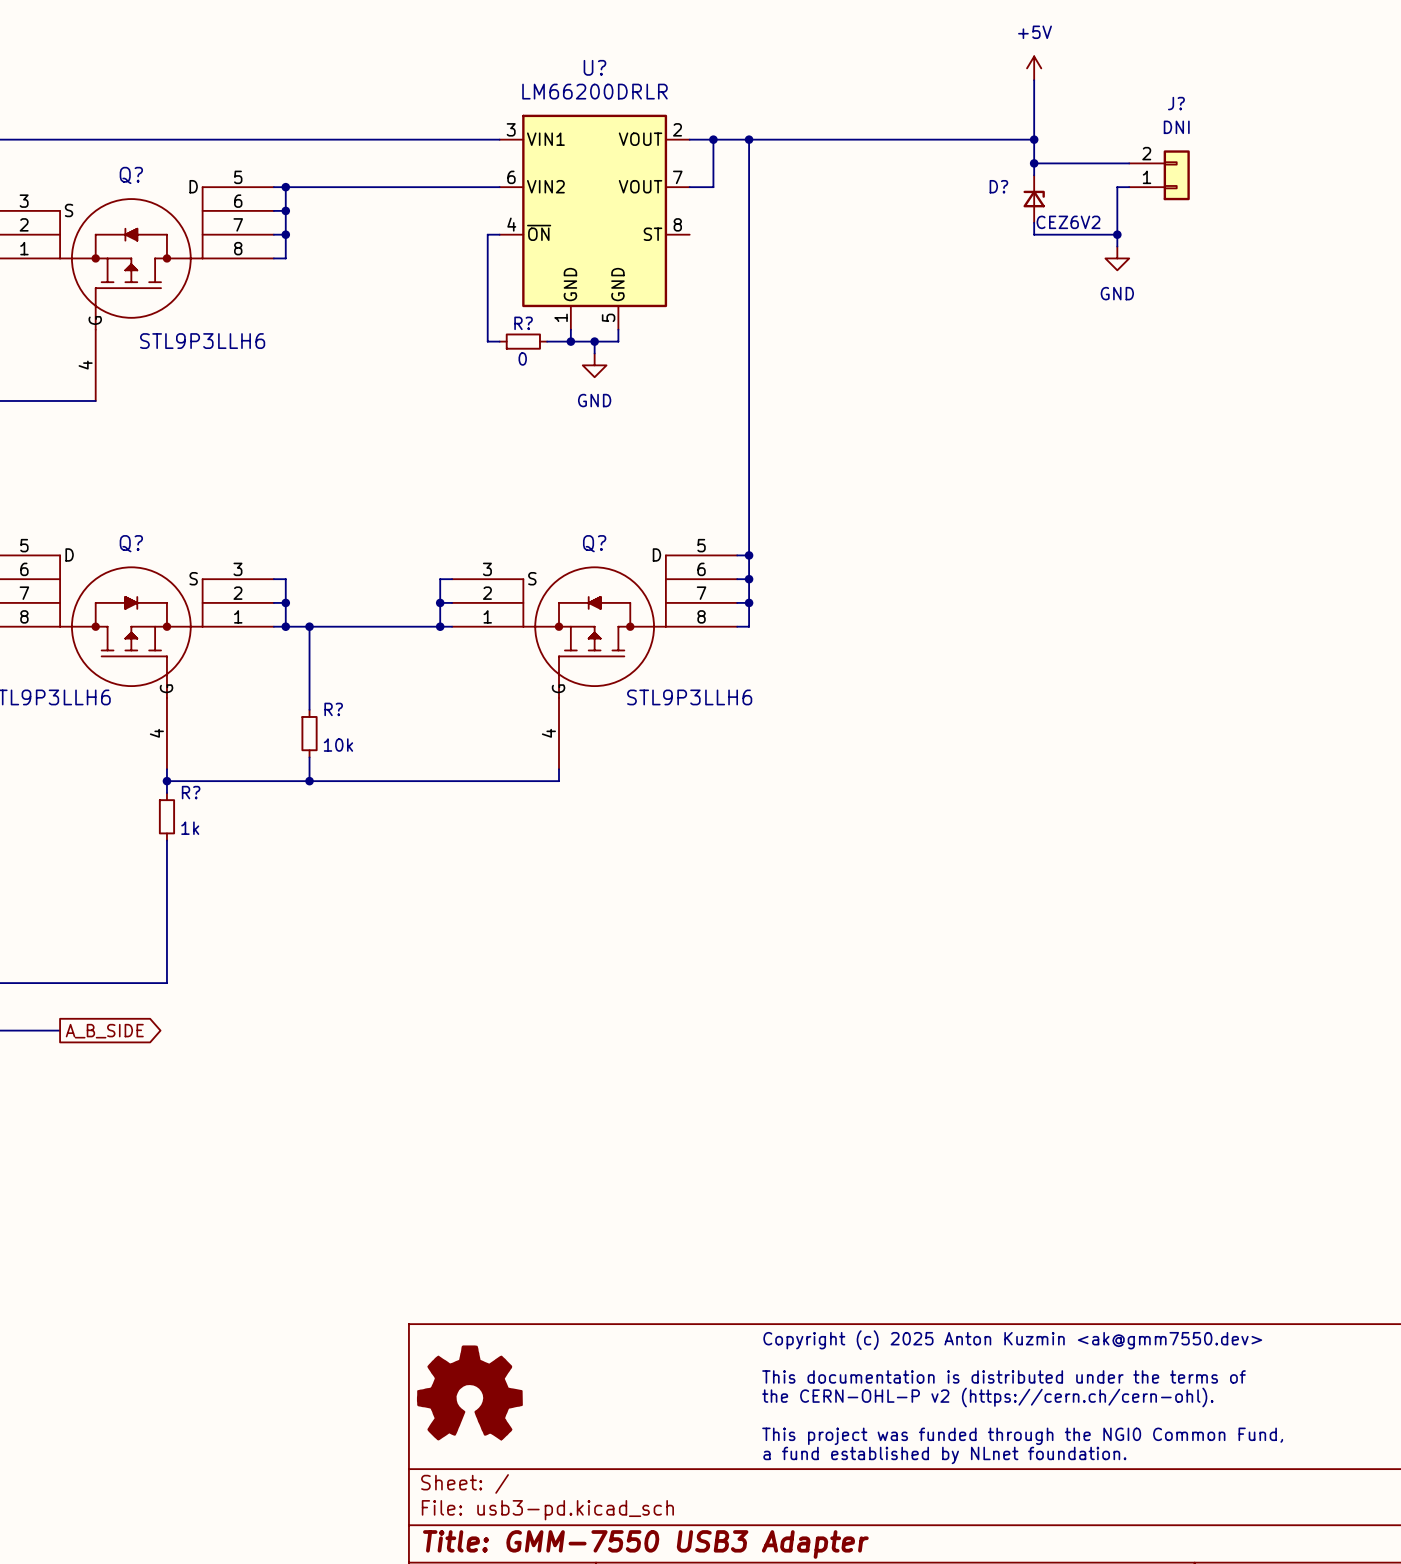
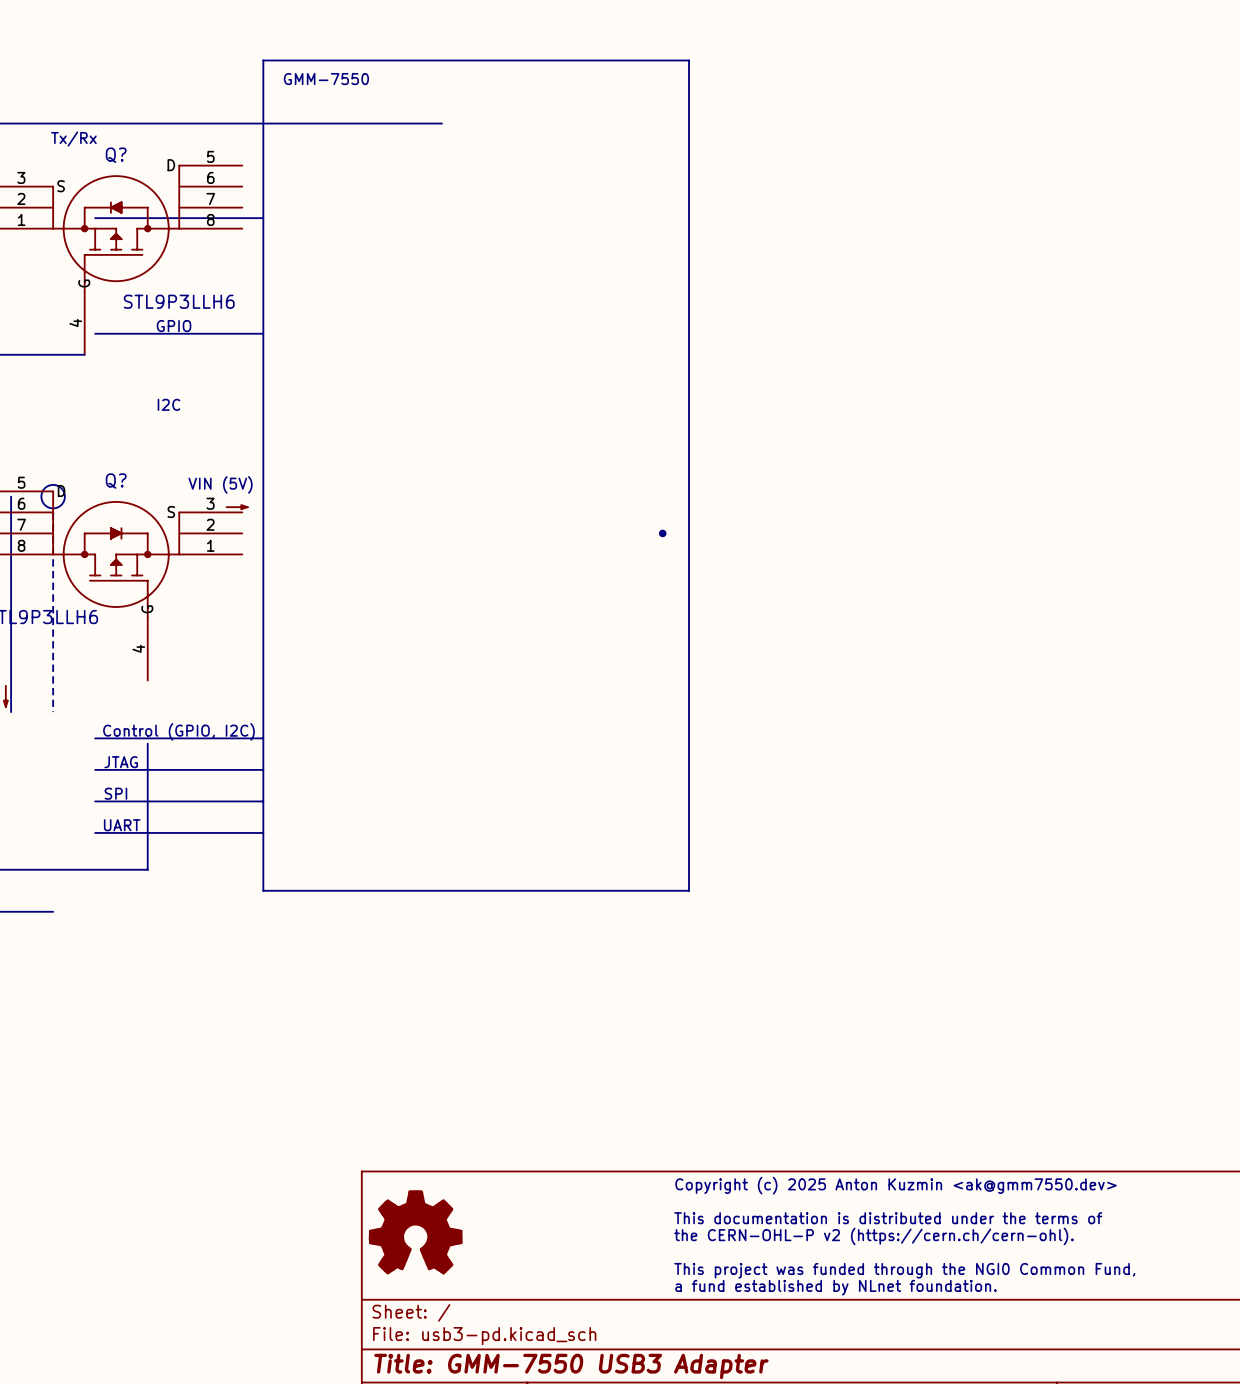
line: none -> (263, 60) (688, 60) (688, 890) (263, 890) (263, 60)
power symbol: +5V (1034, 68) -> none
wire: (1034, 80) (1034, 175) -> none
text: none -> GMM-7550 (326, 79)
wire: (689, 139) (1034, 139) -> none
wire: (713, 139) (713, 187) (689, 187) -> none
junction: (713, 139) -> none
wire: (749, 139) (749, 626) (737, 626) -> none
junction: (749, 139) -> none
junction: (1034, 139) -> none
text: none -> Tx/Rx (73, 139)
wire: (1034, 163) (1129, 163) -> none
junction: (1034, 163) -> none
J?: DNI (1159, 175) -> none
wire: (273, 187) (499, 187) -> none
wire: (285, 187) (285, 258) (273, 258) -> none
junction: (285, 187) -> none
wire: (1129, 187) (1117, 187) (1117, 246) -> none
D?: CEZ6V2 (1034, 199) -> none
wire: (273, 210) (285, 210) -> none
junction: (285, 210) -> none
U?: LM66200DRLR (594, 222) -> none
wire: (1034, 222) (1034, 234) (1117, 234) -> none
wire: (273, 234) (285, 234) -> none
junction: (285, 234) -> none
wire: (499, 234) (487, 234) (487, 341) (499, 341) -> none
junction: (1117, 234) -> none
line: none -> (95, 218) (263, 218)
power symbol: GND (1117, 258) -> none
wire: (570, 329) (570, 341) -> none
wire: (618, 329) (618, 341) (547, 341) -> none
R?: 0 (523, 341) -> none
junction: (570, 341) -> none
wire: (594, 341) (594, 353) -> none
junction: (594, 341) -> none
power symbol: GND (594, 365) -> none
text: none -> GPIO (174, 326)
line: none -> (95, 333) (263, 333)
text: none -> I2C (169, 404)
drawing: none -> [41, 484, 65, 509]
text: none -> VIN (5V) (220, 484)
wire: (737, 555) (749, 555) -> none
junction: (749, 555) -> none
line: none -> (11, 496) (11, 712)
power symbol: none -> (237, 507)
line: none -> (53, 512) (53, 712)
wire: (273, 579) (285, 579) (285, 626) -> none
wire: (452, 579) (440, 579) (440, 626) -> none
wire: (737, 579) (749, 579) -> none
junction: (749, 579) -> none
wire: (273, 602) (285, 602) -> none
junction: (285, 602) -> none
wire: (440, 602) (452, 602) -> none
junction: (440, 602) -> none
wire: (737, 602) (749, 602) -> none
wire: (273, 626) (452, 626) -> none
junction: (285, 626) -> none
wire: (309, 626) (309, 709) -> none
junction: (309, 626) -> none
junction: (440, 626) -> none
Q?: STL9P3LLH6 (594, 662) -> none
R?: 10k (309, 733) -> none
wire: (309, 757) (309, 781) -> none
wire: (166, 769) (166, 793) -> none
wire: (558, 769) (558, 781) (166, 781) -> none
junction: (166, 781) -> none
junction: (309, 781) -> none
power symbol: none -> (5, 696)
R?: 1k (166, 816) -> none
text: none -> Control (GPIO, I2C) (179, 731)
line: none -> (95, 738) (263, 738)
text: none -> JTAG (121, 762)
line: none -> (95, 769) (263, 769)
text: none -> SPI (115, 793)
line: none -> (95, 801) (263, 801)
text: none -> UART (122, 825)
line: none -> (95, 832) (263, 832)
global label: A_B_SIDE (104, 1031) -> none

